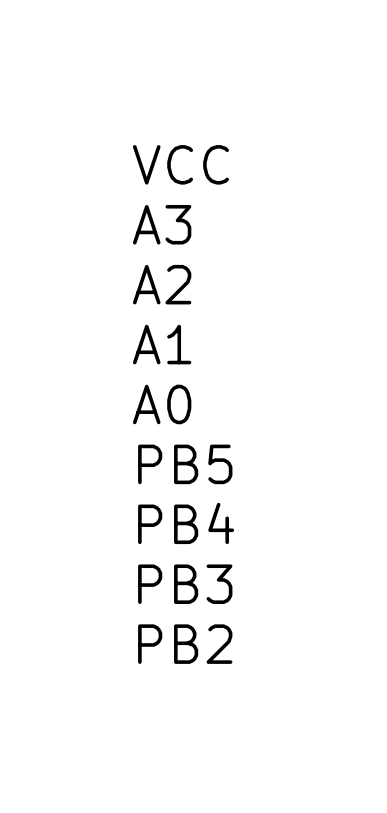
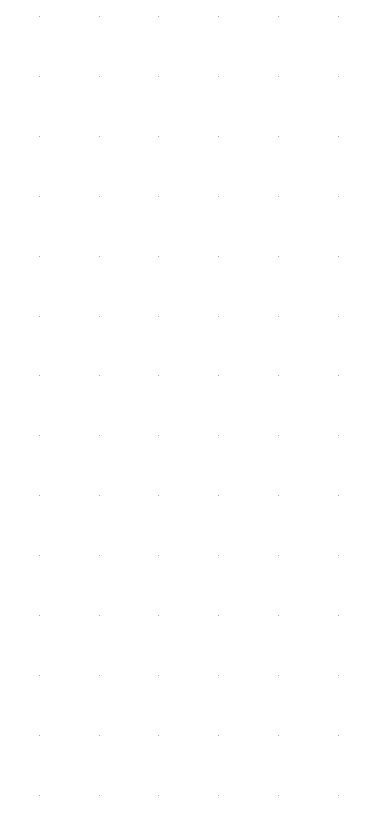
label: VCC (180, 164) -> none
label: A3 (162, 224) -> none
label: A2 (162, 284) -> none
label: A1 (162, 344) -> none
label: A0 (162, 404) -> none
label: PB5 (185, 464) -> none
label: PB4 (186, 523) -> none
label: PB3 (185, 584) -> none
label: PB2 (185, 644) -> none

